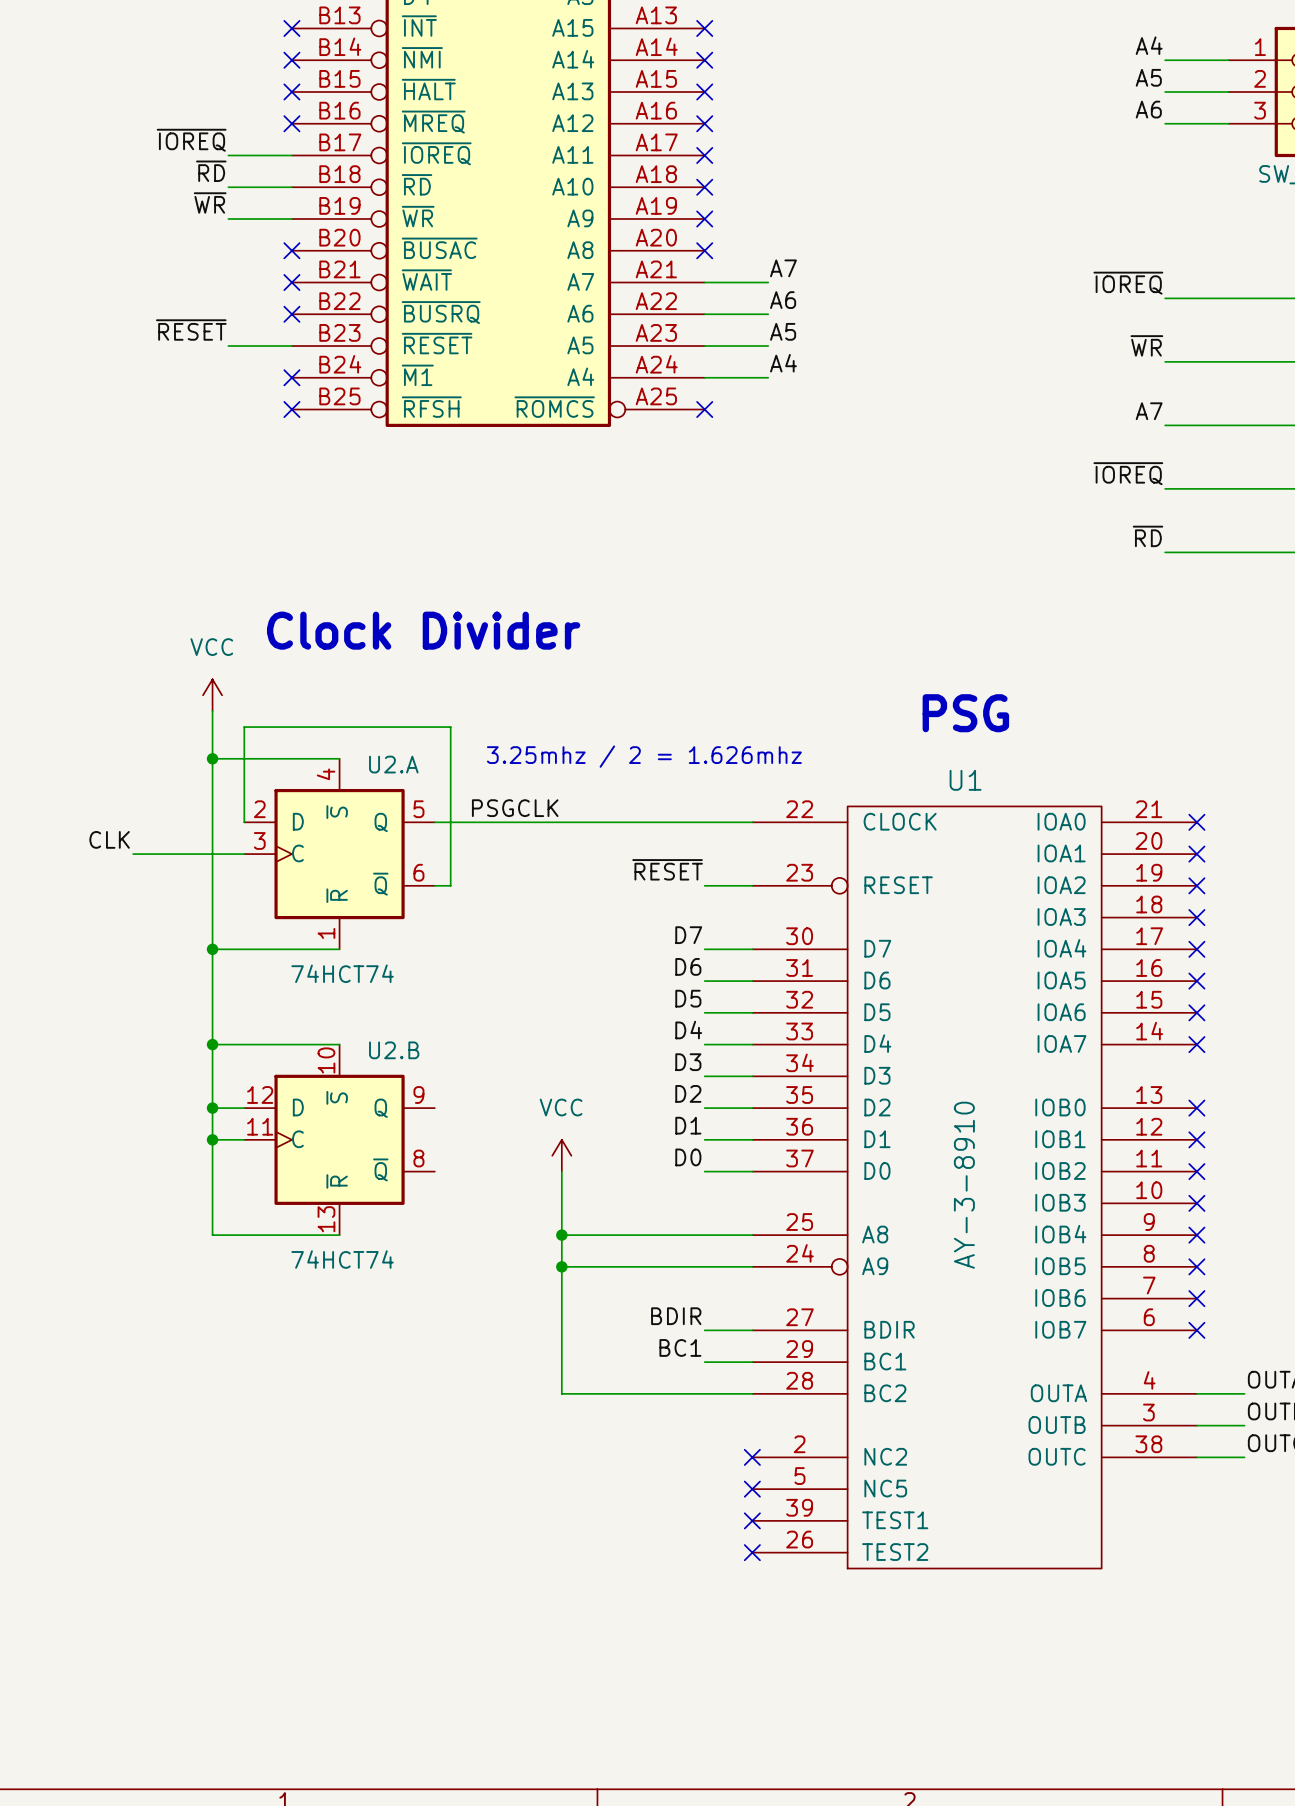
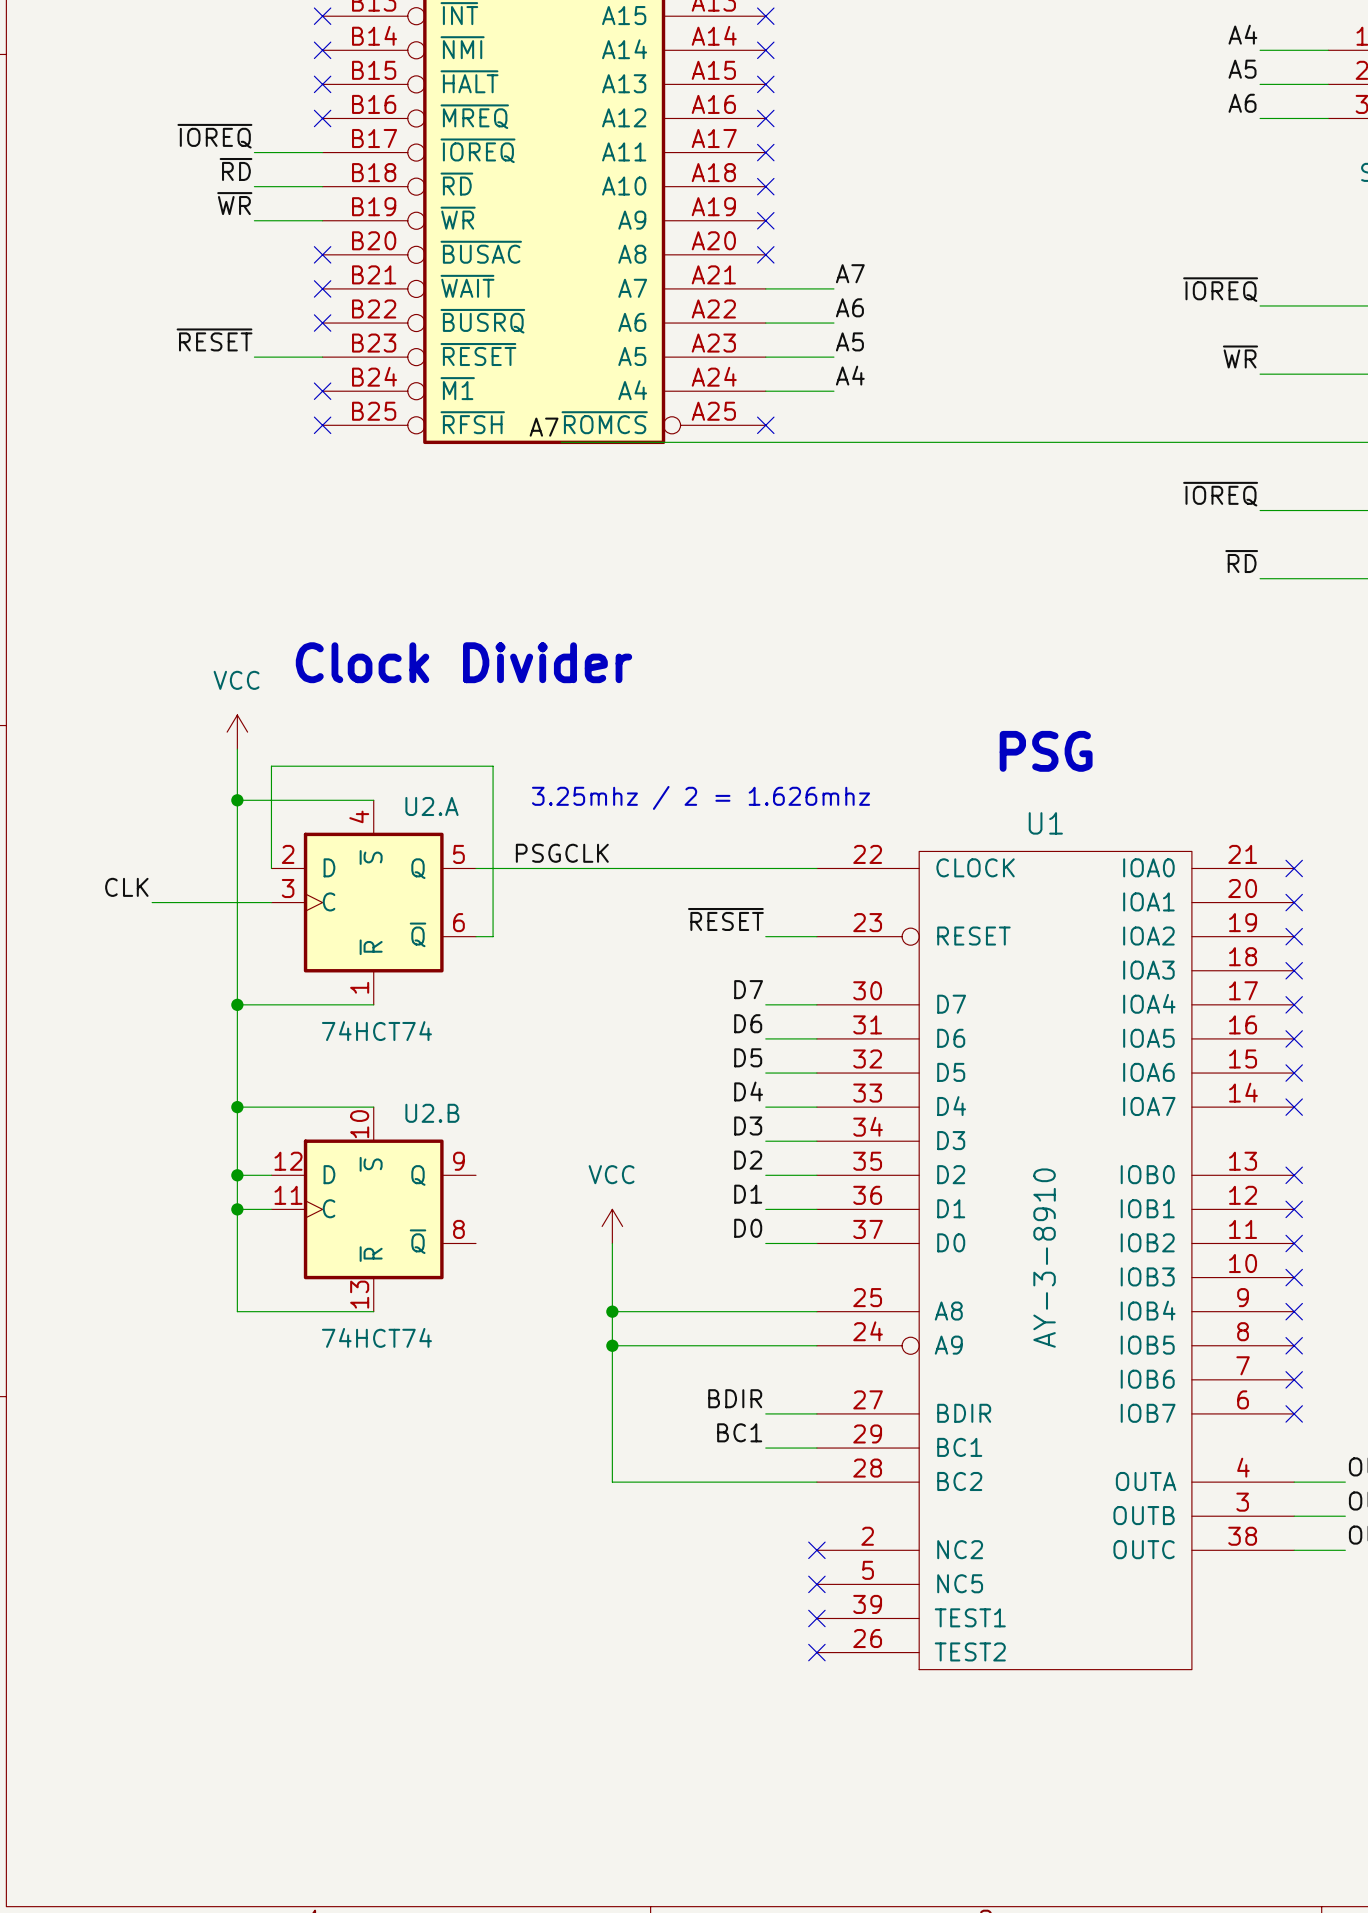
label: none -> A7 (544, 427)
label: A7 (1149, 411) -> none
wire: none -> (561, 442) (1260, 442)

